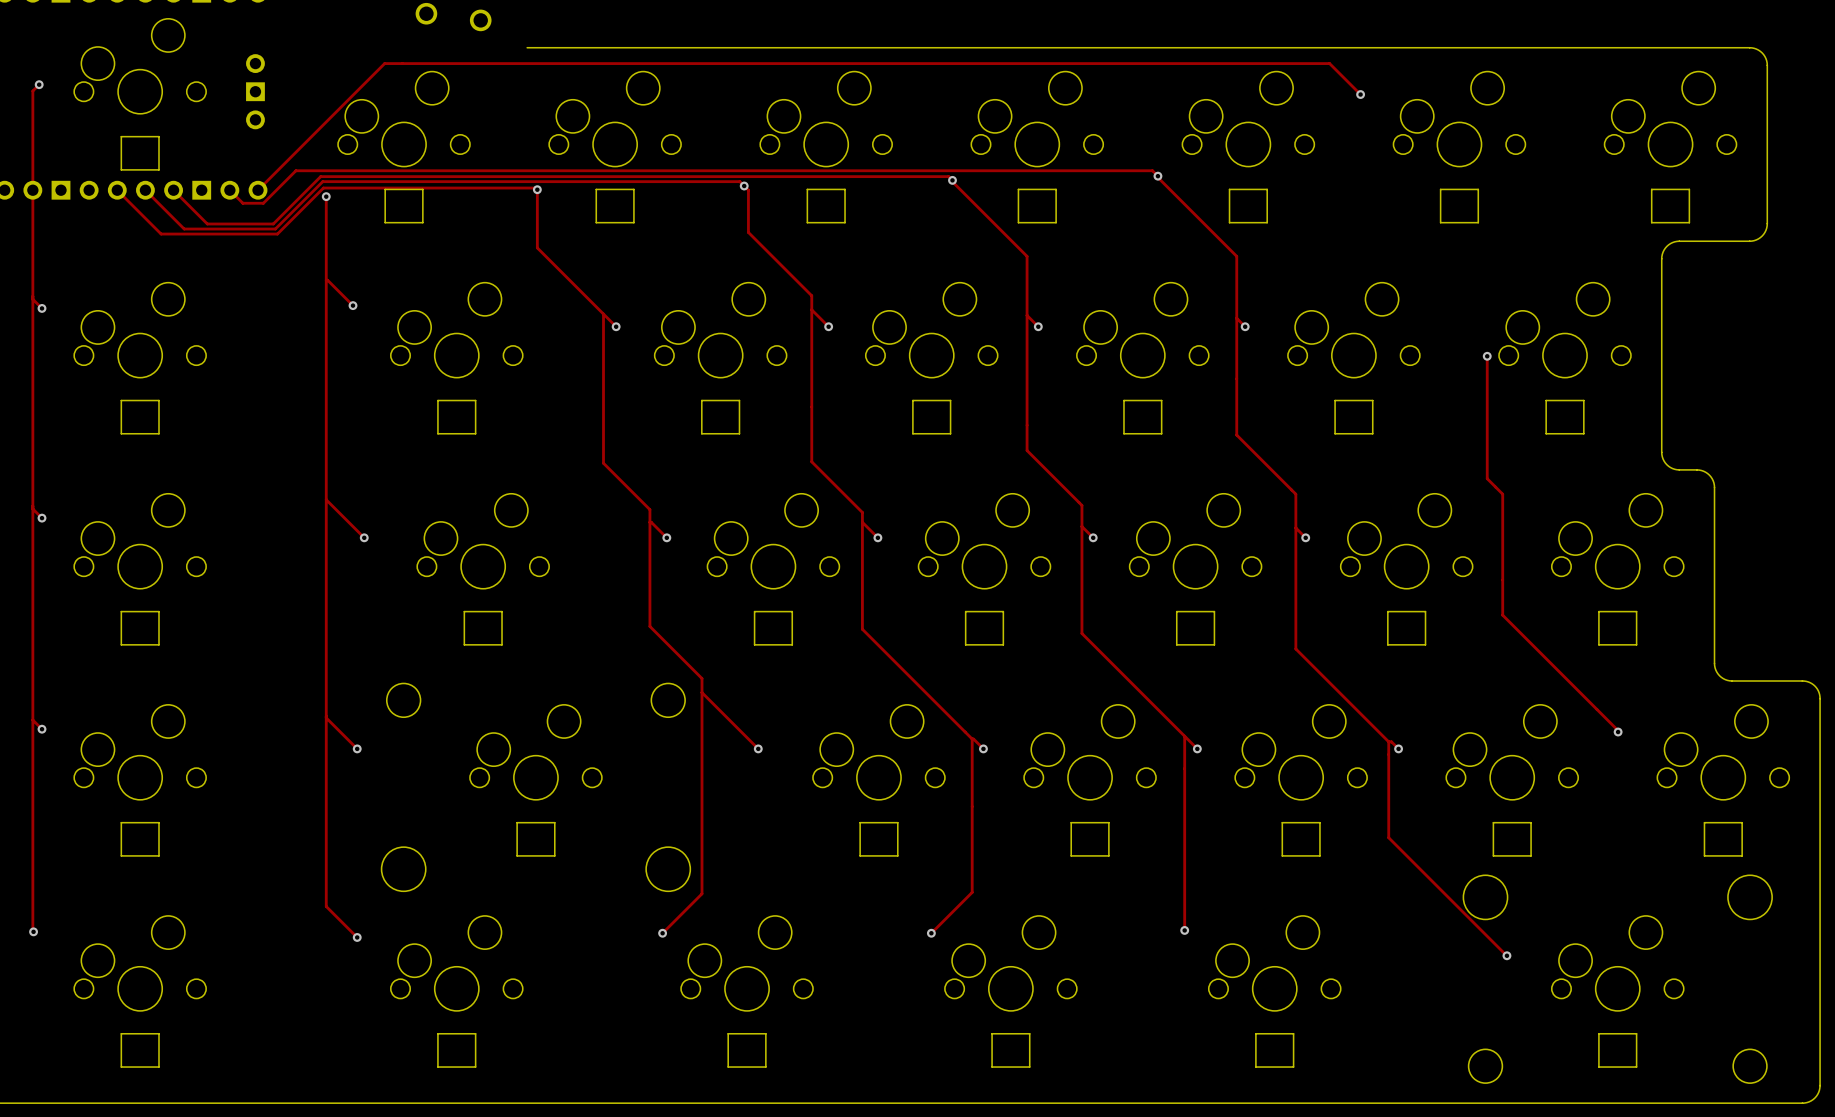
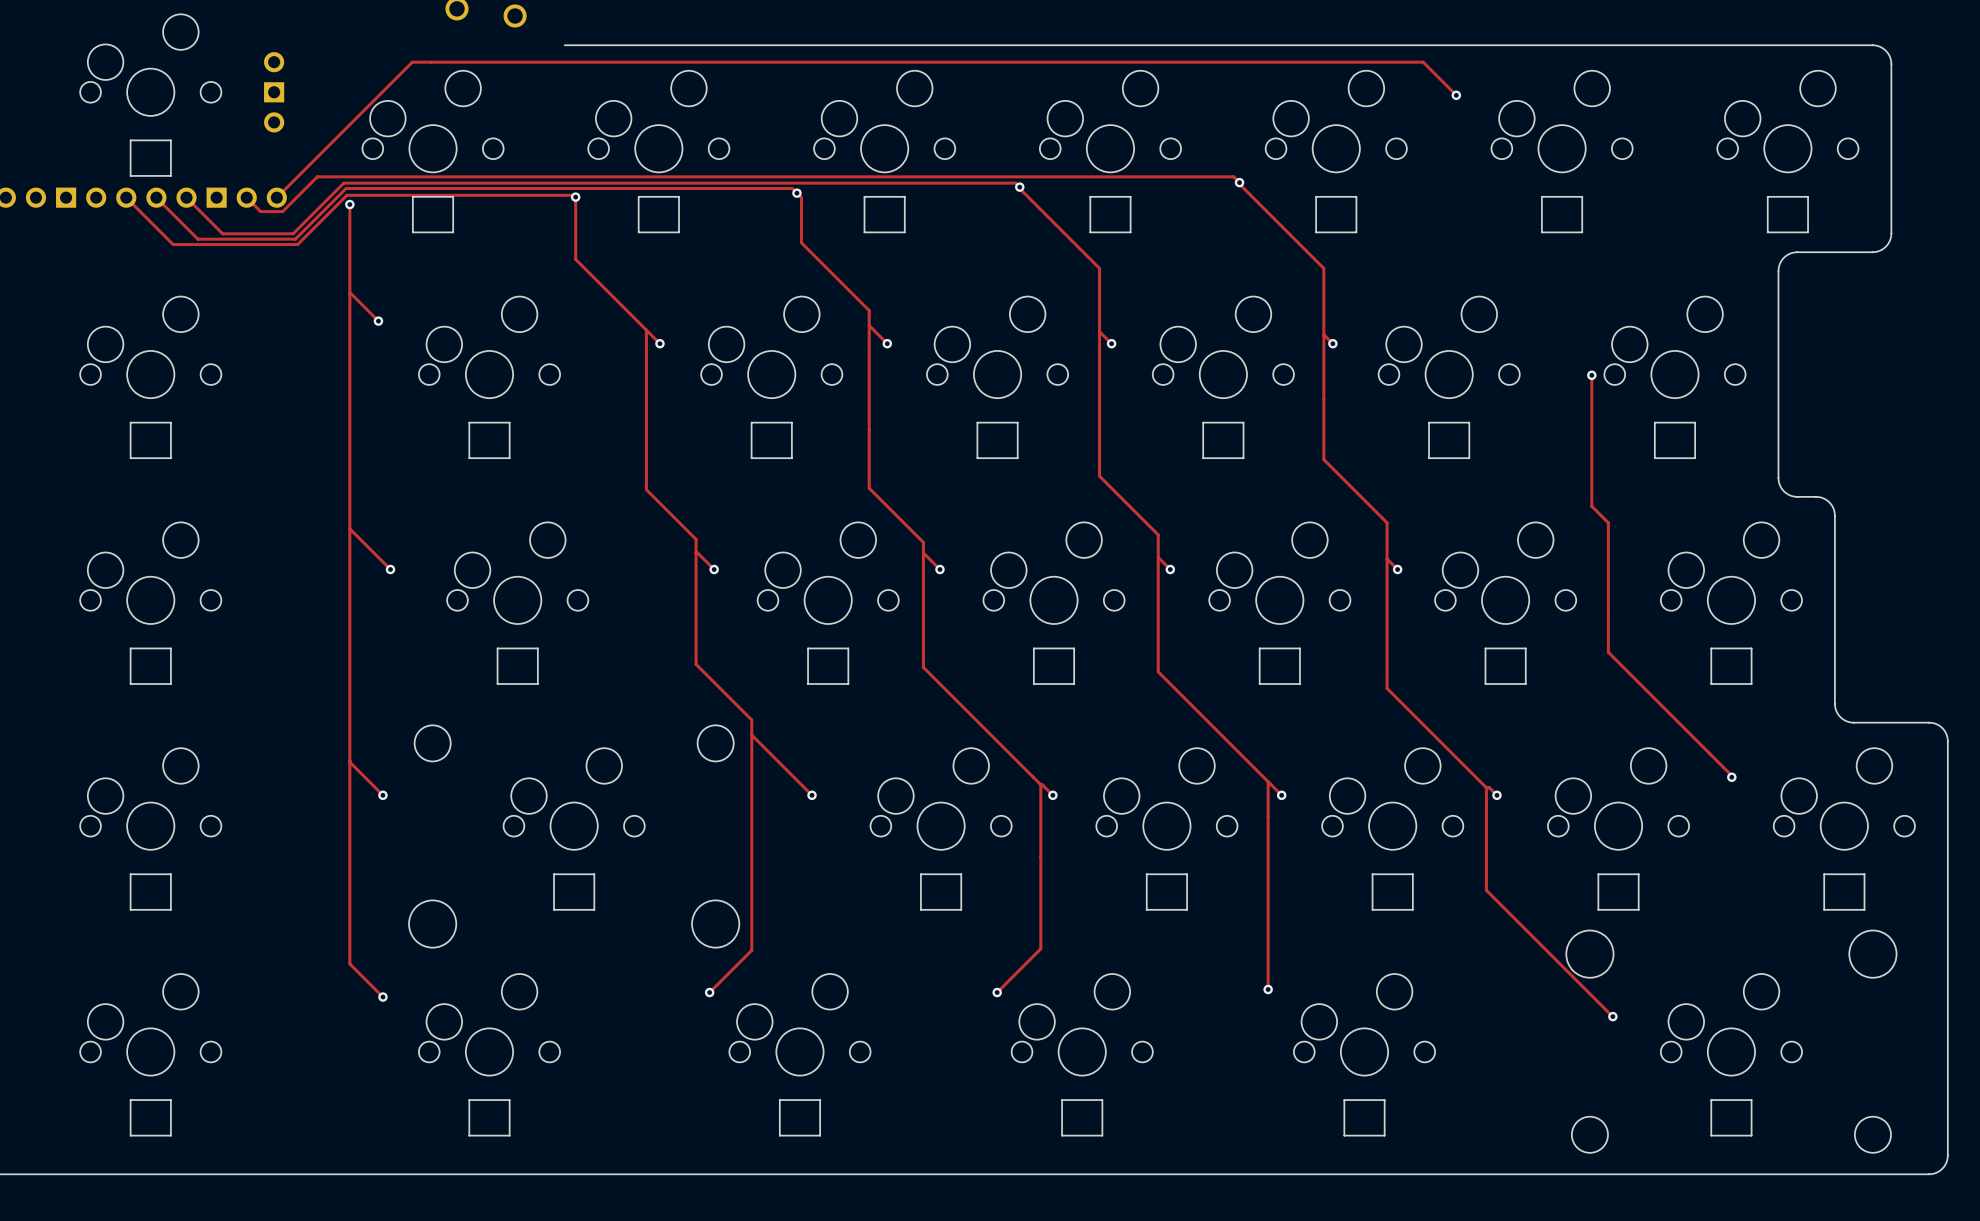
track: (39, 84) (32, 91) (33, 931) -> none
via: (39, 84) -> none
track: (32, 299) (42, 308) -> none
via: (42, 308) -> none
track: (32, 508) (42, 518) -> none
via: (42, 518) -> none
track: (32, 720) (42, 729) -> none
via: (42, 729) -> none
via: (33, 931) -> none

